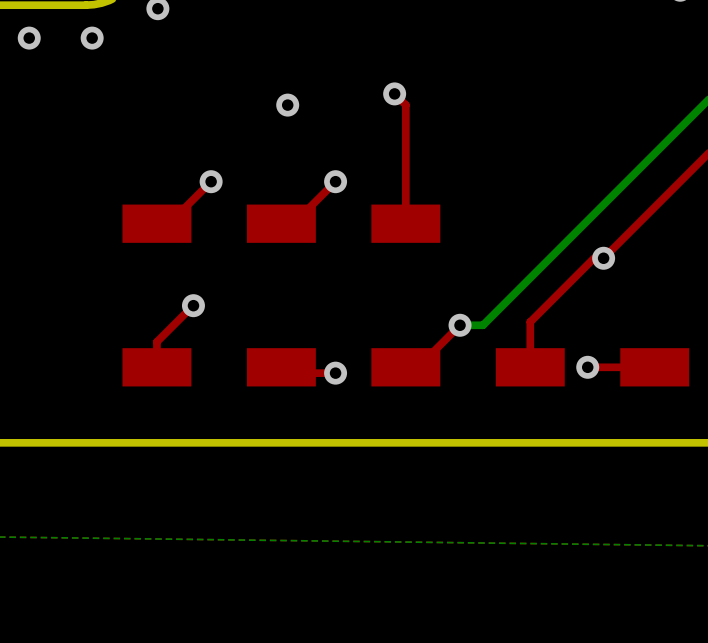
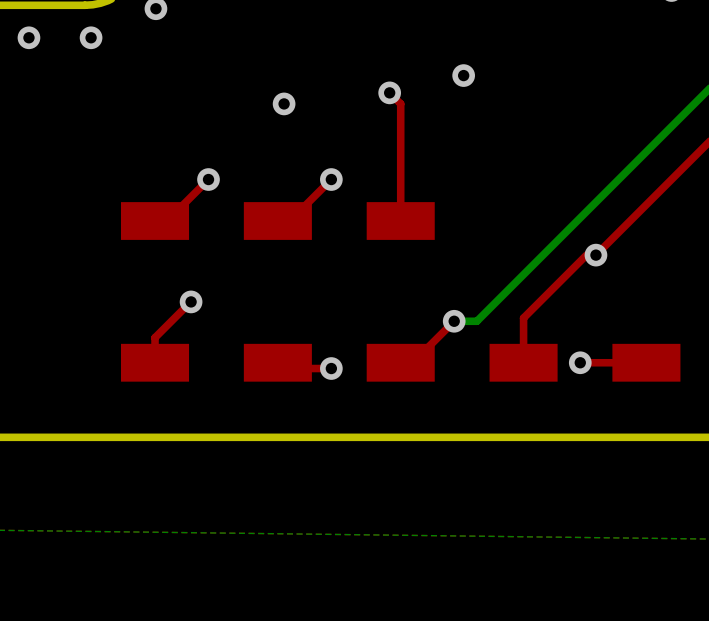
via: none -> (463, 75)

